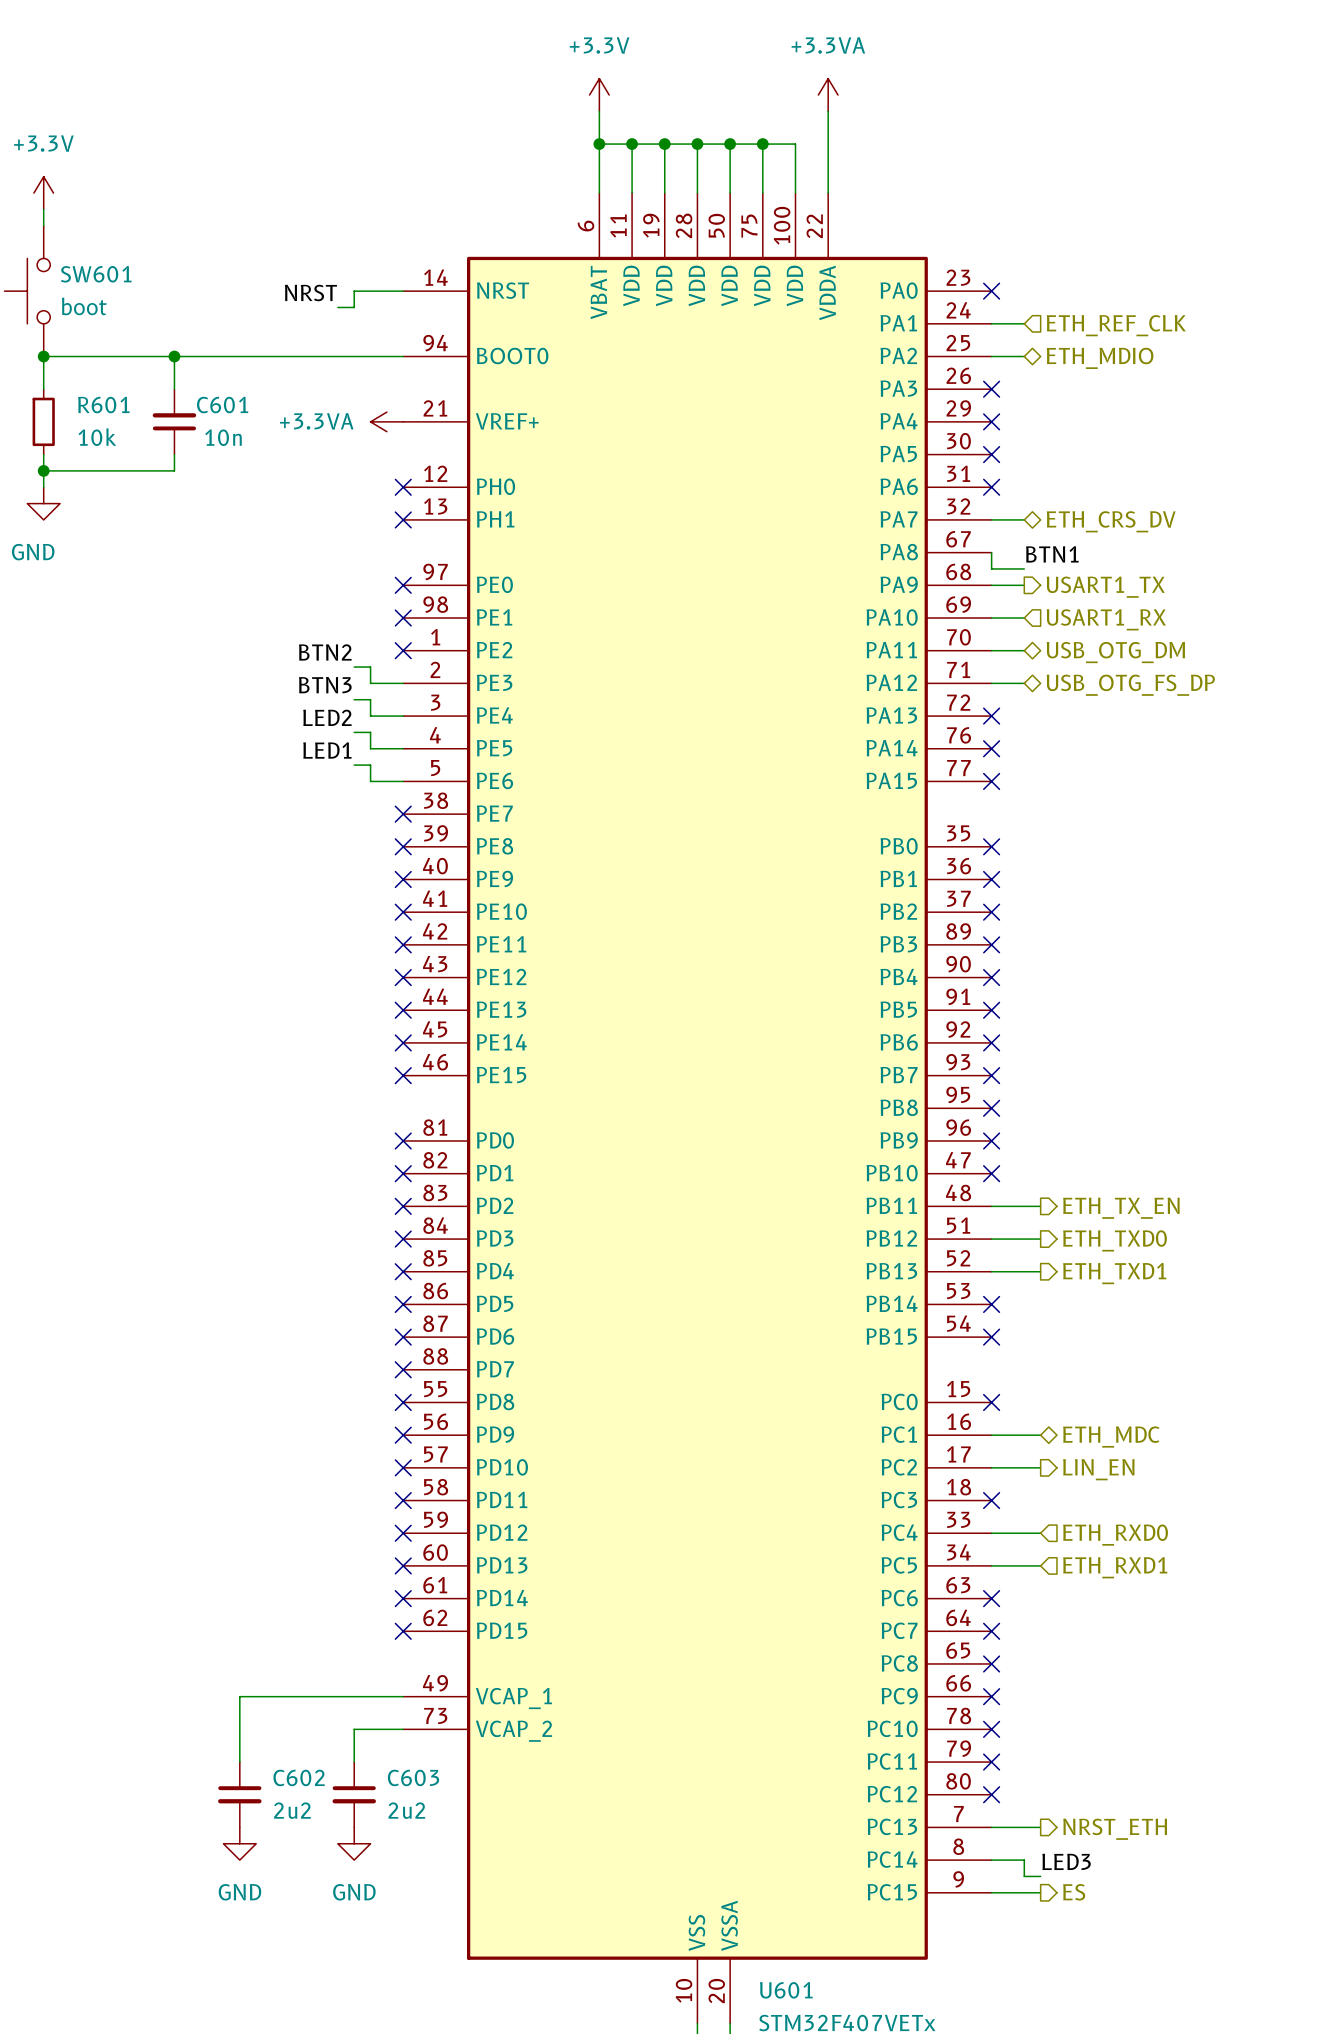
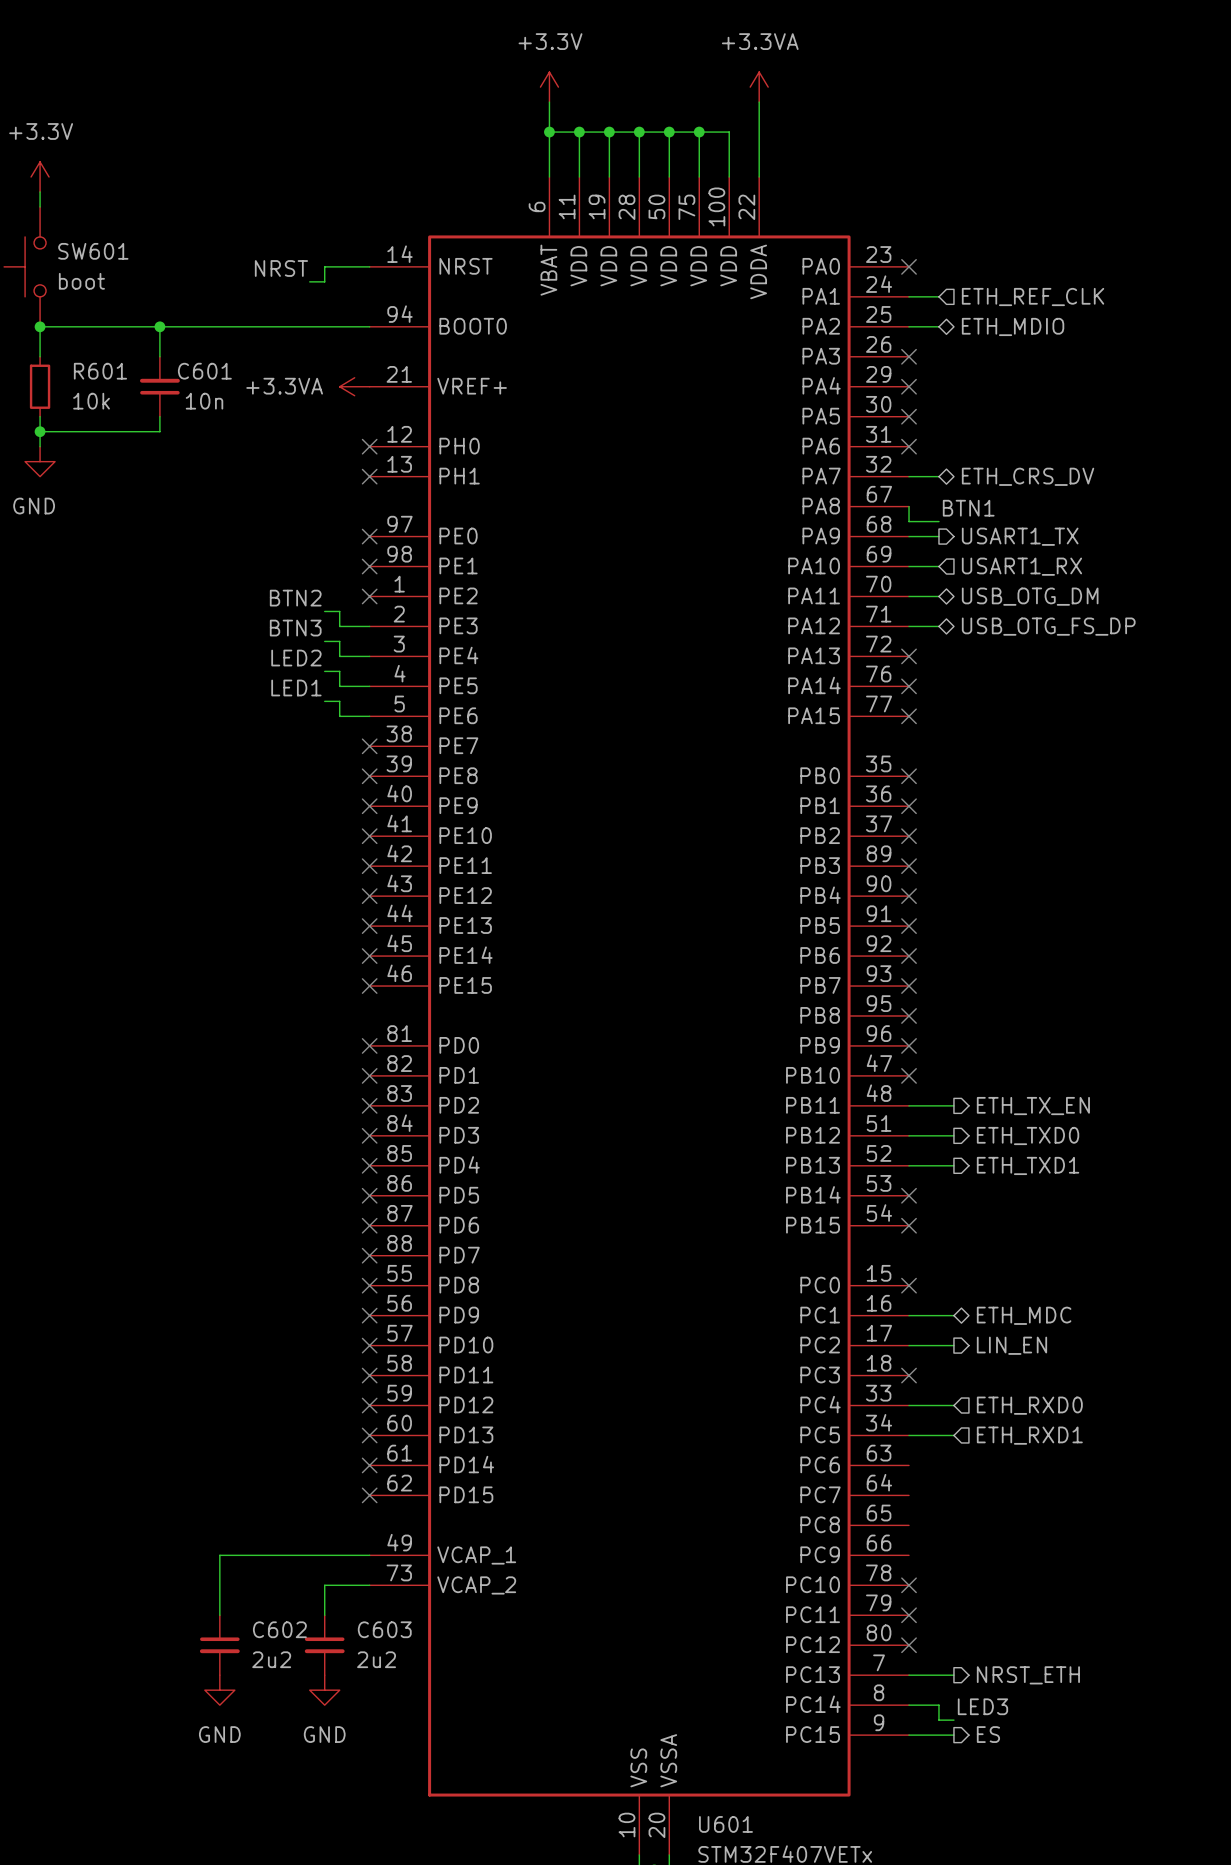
no-connect mark: (991, 1598) -> none
no-connect mark: (991, 1631) -> none
no-connect mark: (991, 1663) -> none
no-connect mark: (991, 1696) -> none

